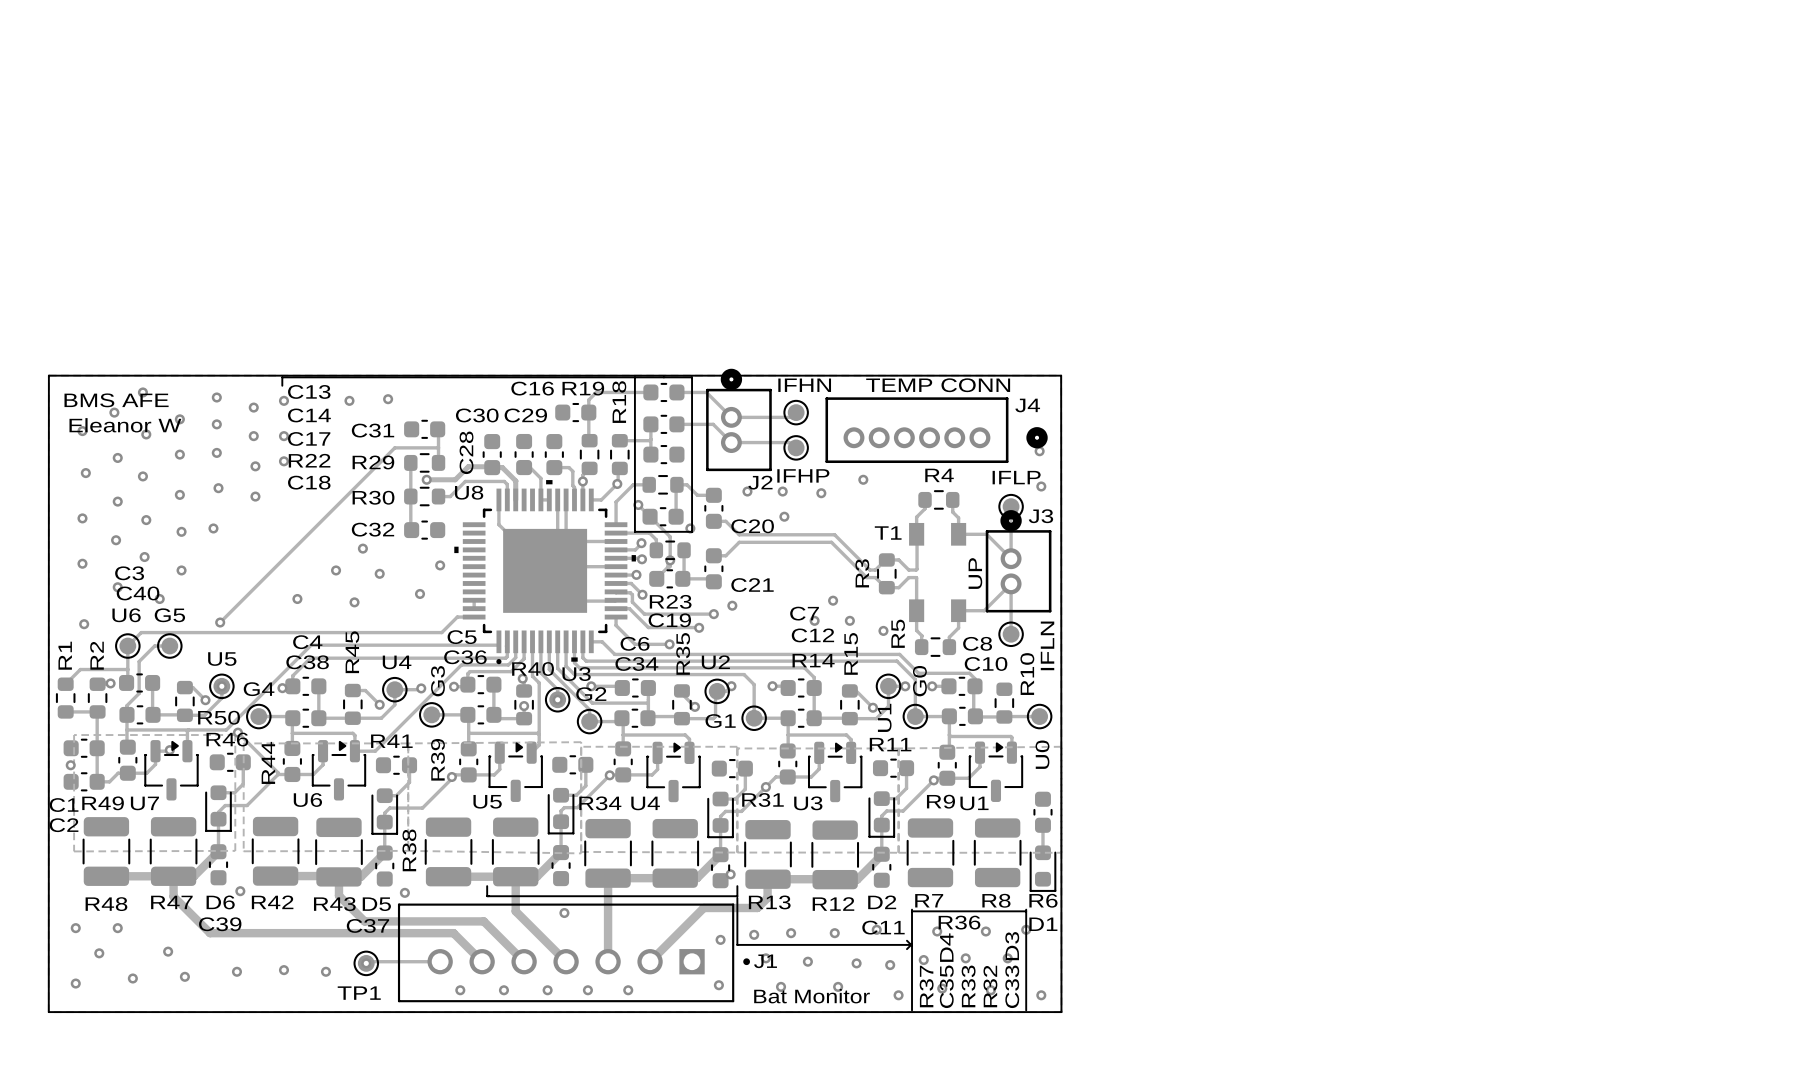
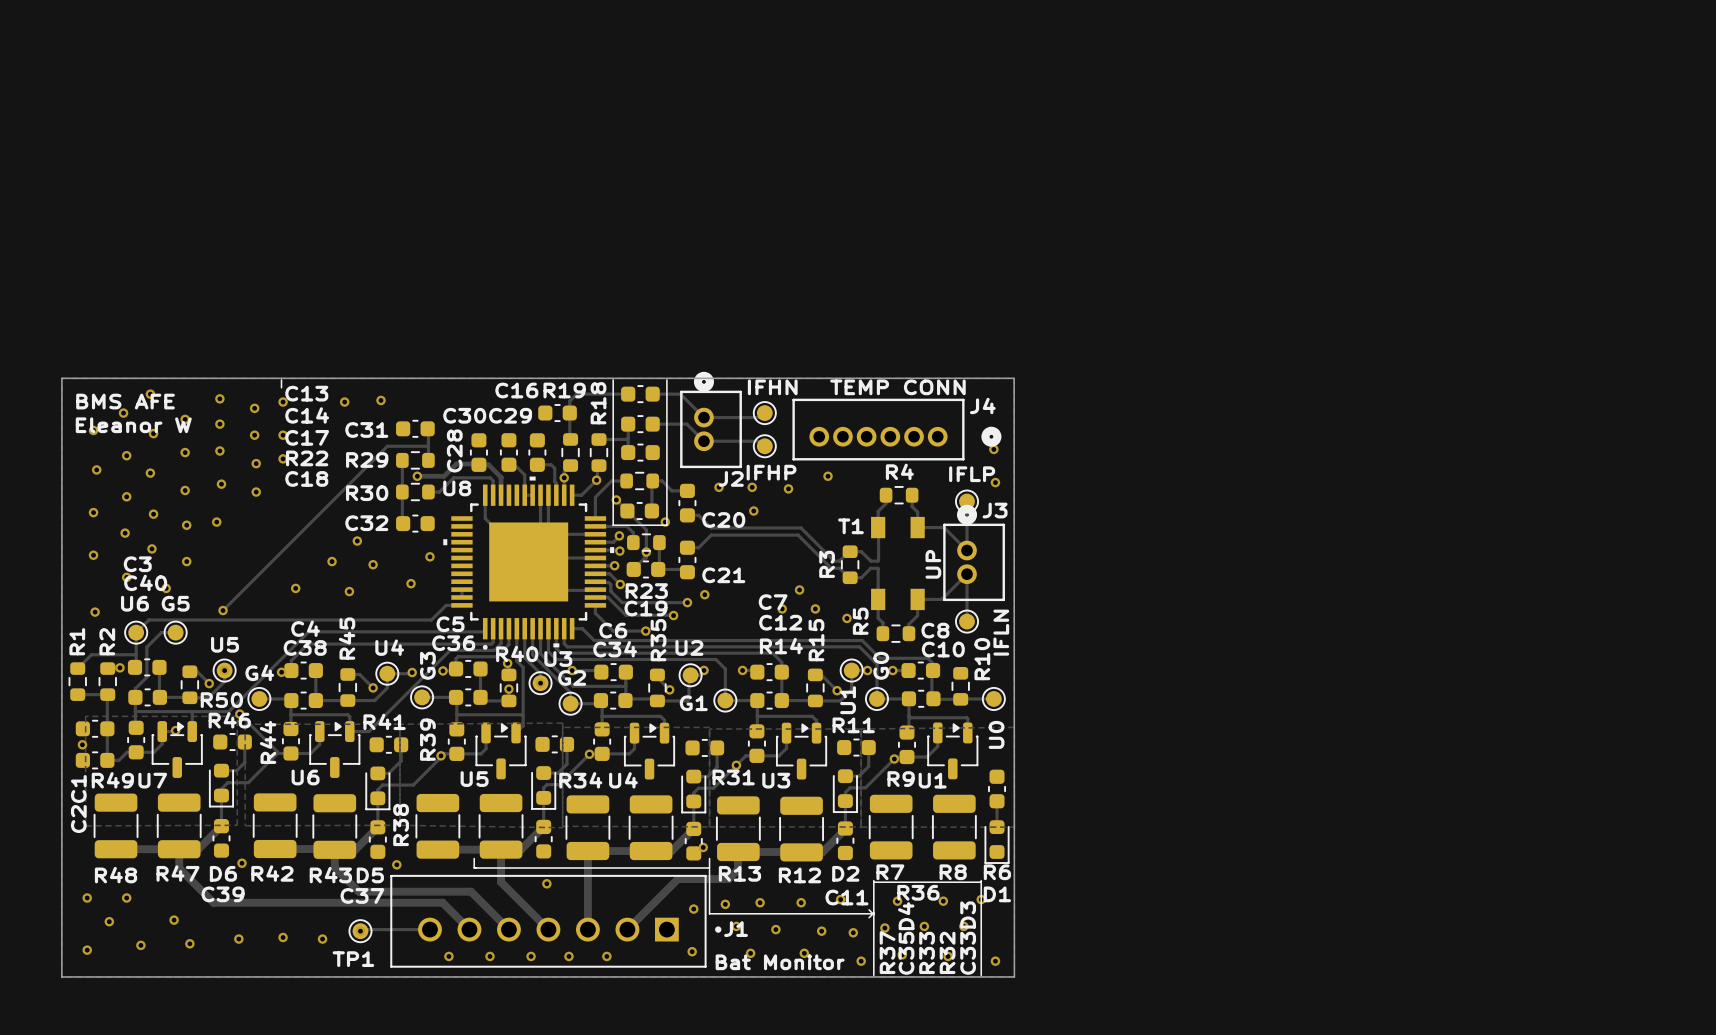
line: (282, 377) (692, 377) -> none
C1 name rotation: 0° (64, 805) -> 90° counterclockwise (78, 789)
C2 name rotation: 0° (64, 825) -> 90° counterclockwise (78, 819)

